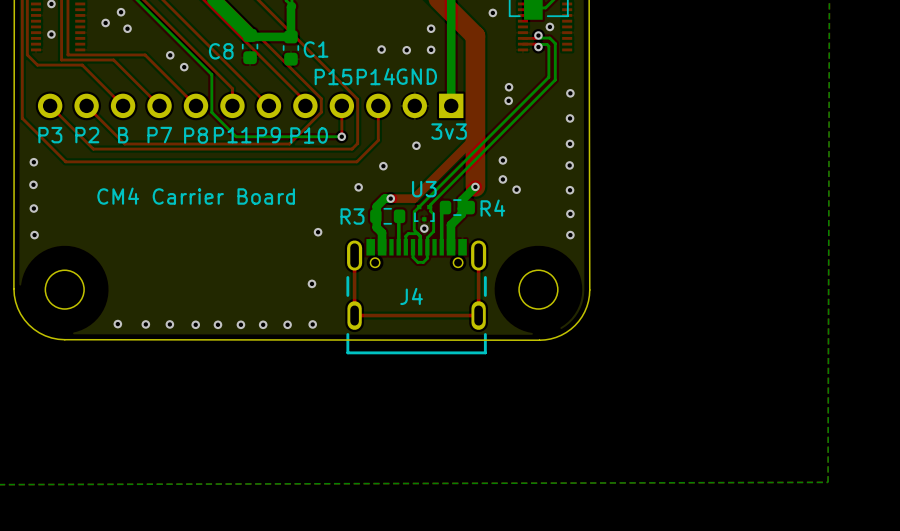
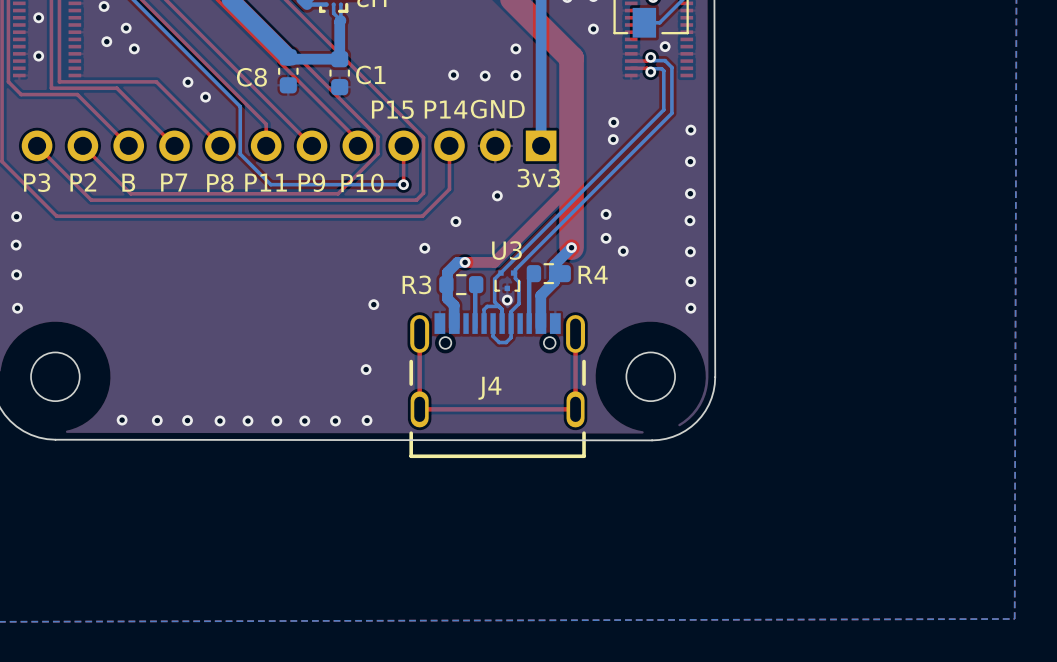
text: CM4 Carrier Board (196, 196) -> none

